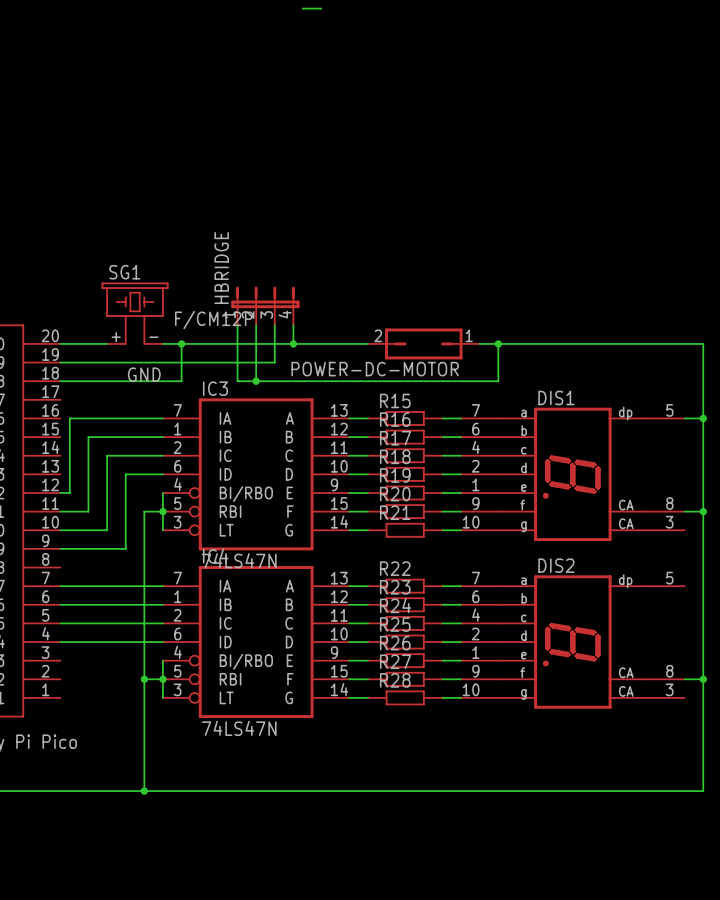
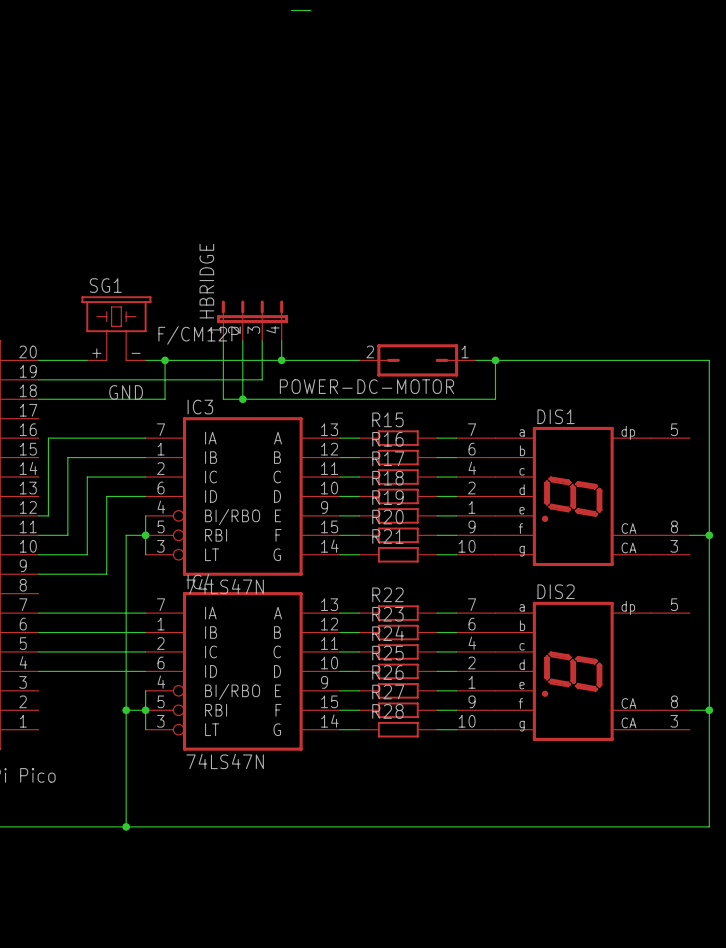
wire: (684, 418) (703, 418) -> none
junction: (703, 418) -> none

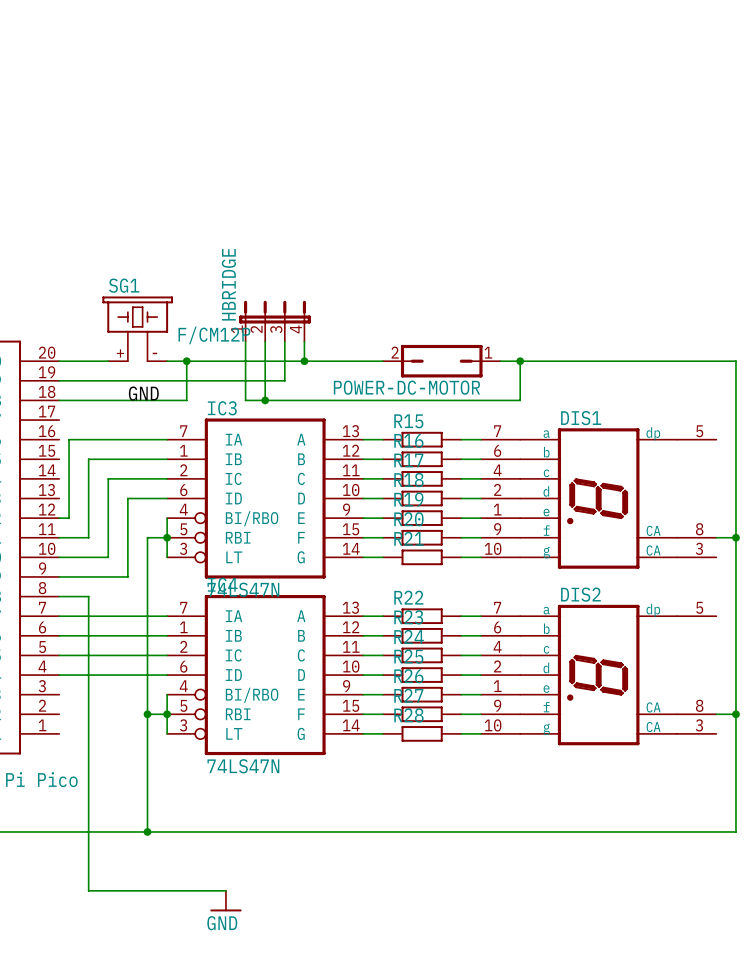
wire: (291, 10) (310, 10) -> none
wire: none -> (59, 596) (88, 596) (88, 890) (225, 890)
power symbol: none -> GND (225, 901)

